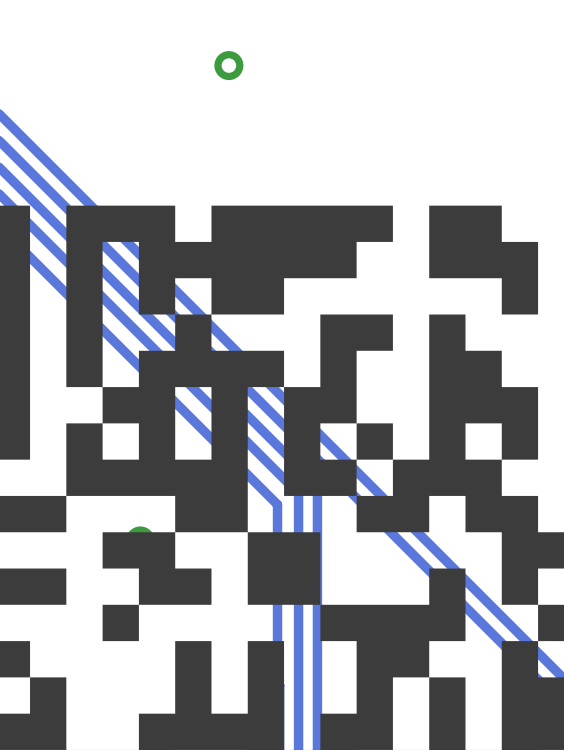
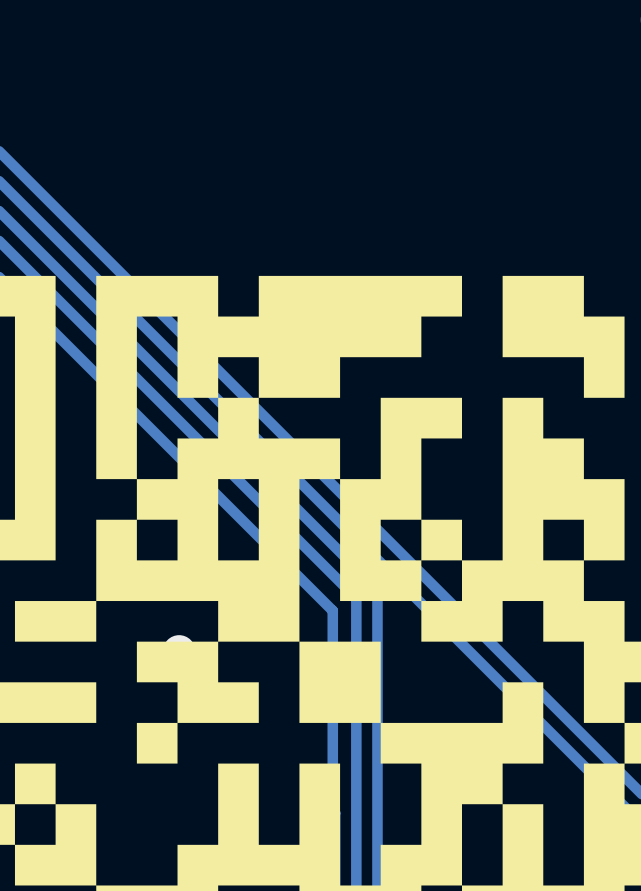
via: (228, 65) -> none

